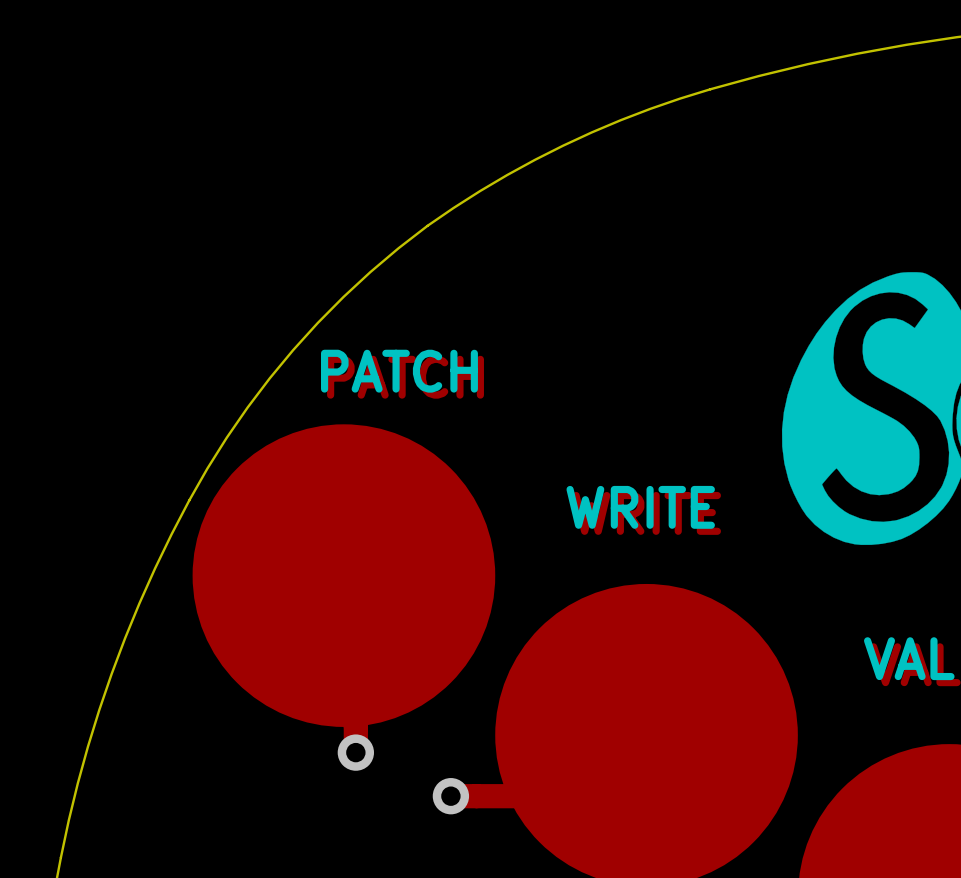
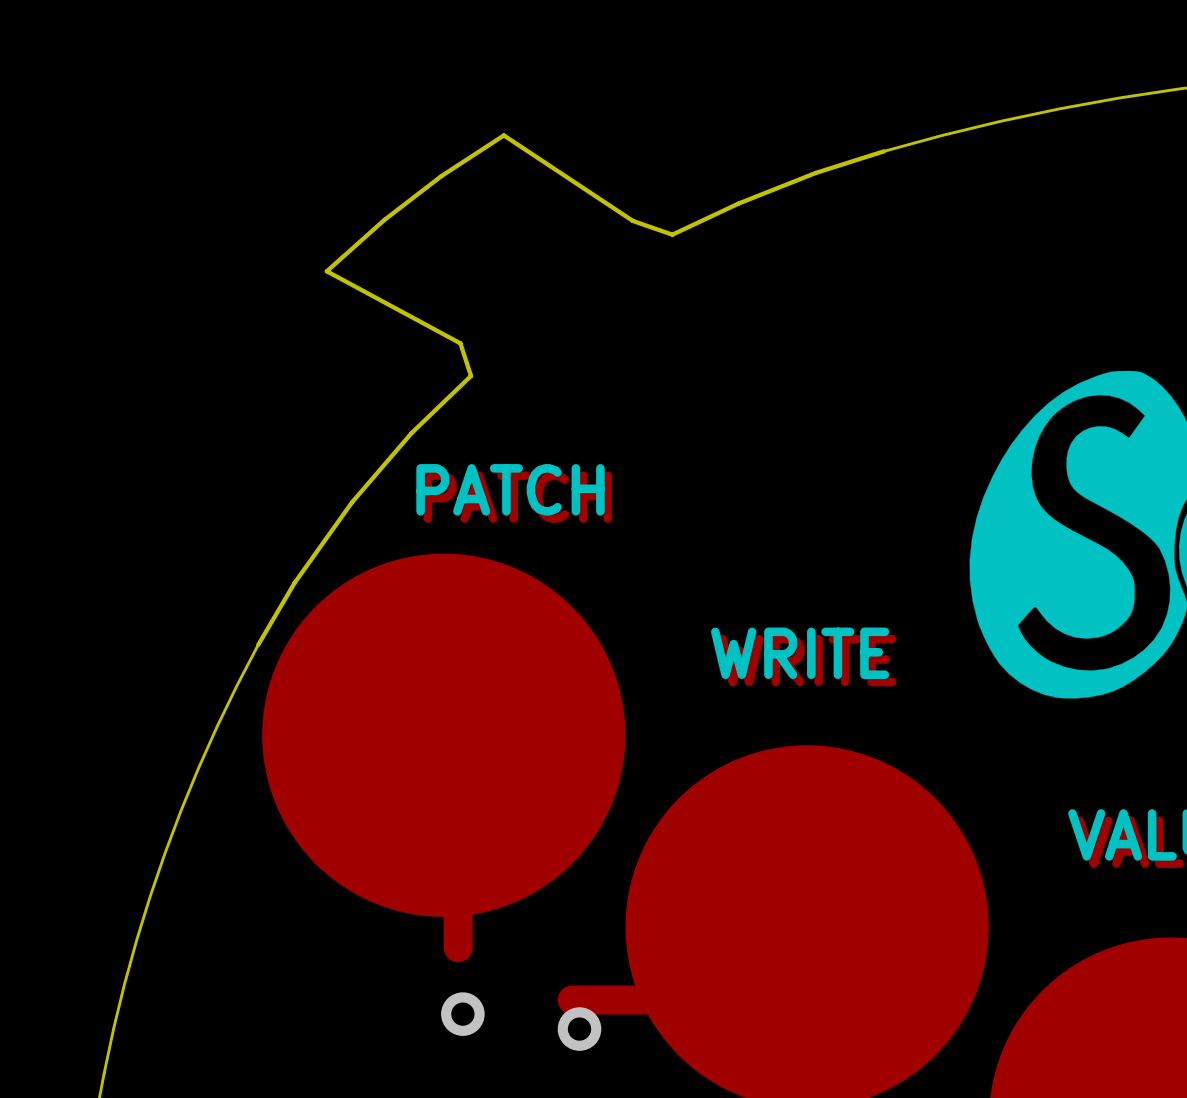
board edge: (710, 89) (620, 120) (534, 159) (453, 208) (398, 248) (343, 296) (317, 322) (269, 378) (226, 437) (189, 500) -> (883, 151) (815, 172) (738, 203) (672, 234) (632, 220) (503, 135) (441, 176) (384, 219) (326, 271) (460, 343) (471, 375) (411, 433) (352, 502) (294, 583) (258, 644)
via: (355, 752) -> none
via position: (450, 796) -> (579, 1029)
via: none -> (462, 1014)

